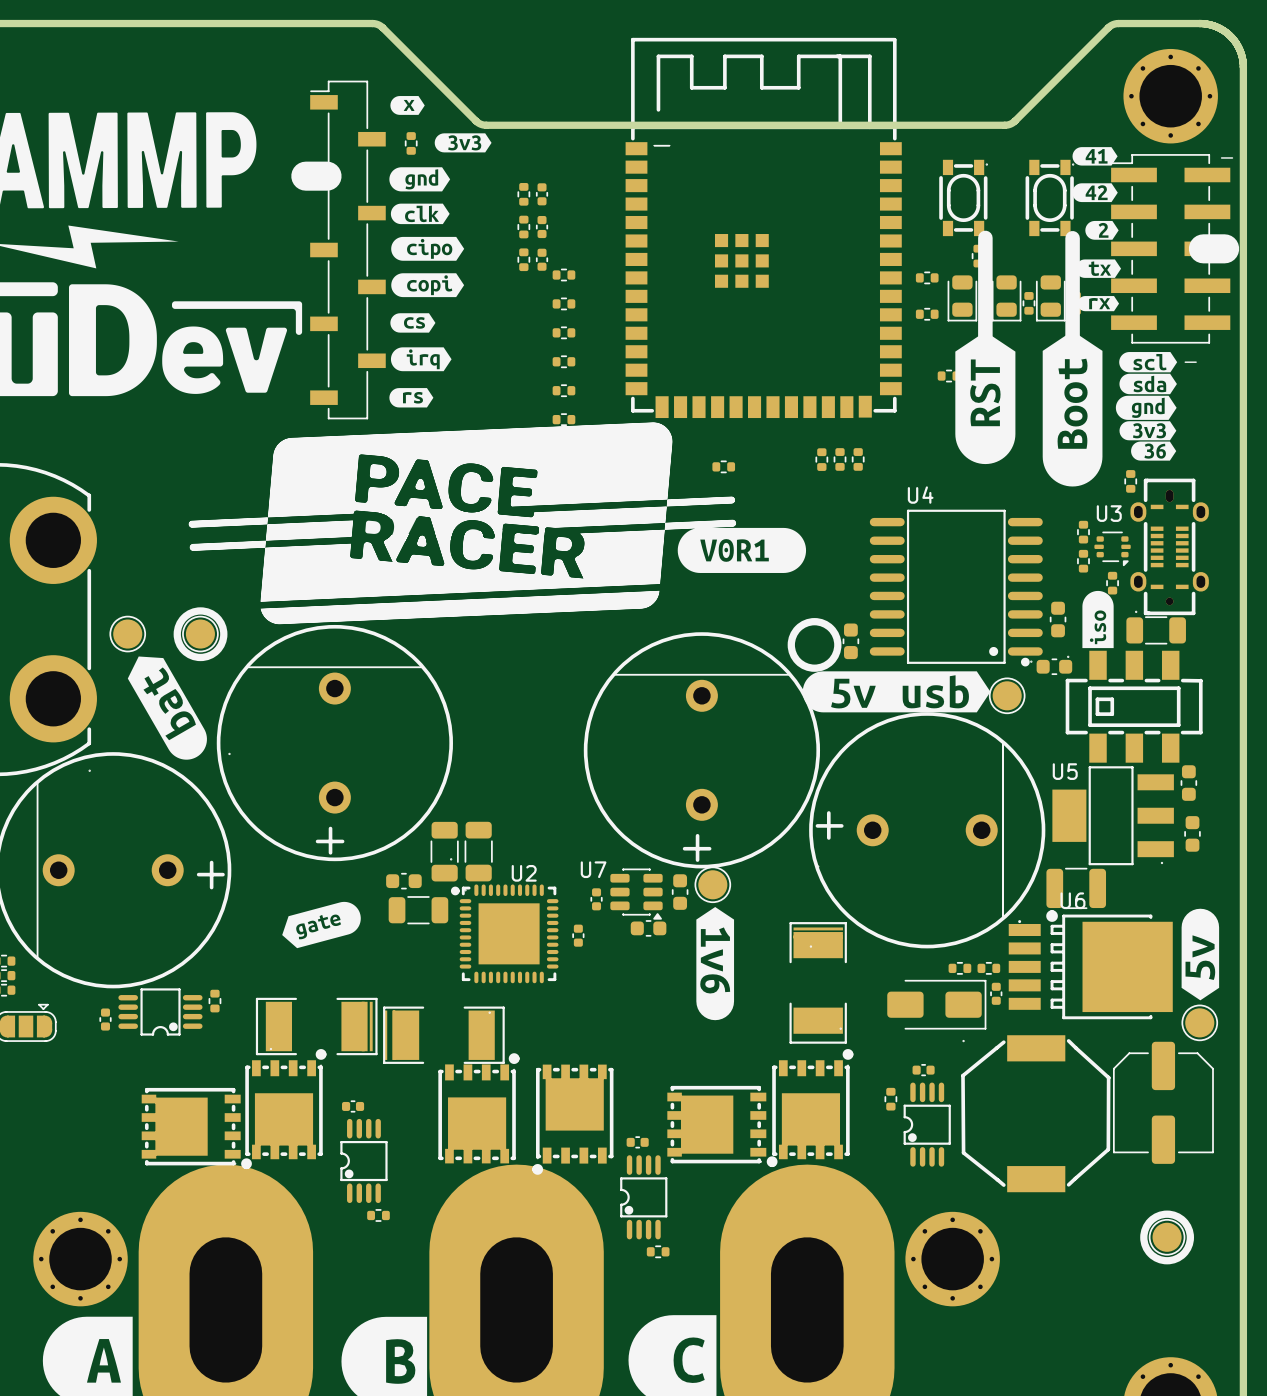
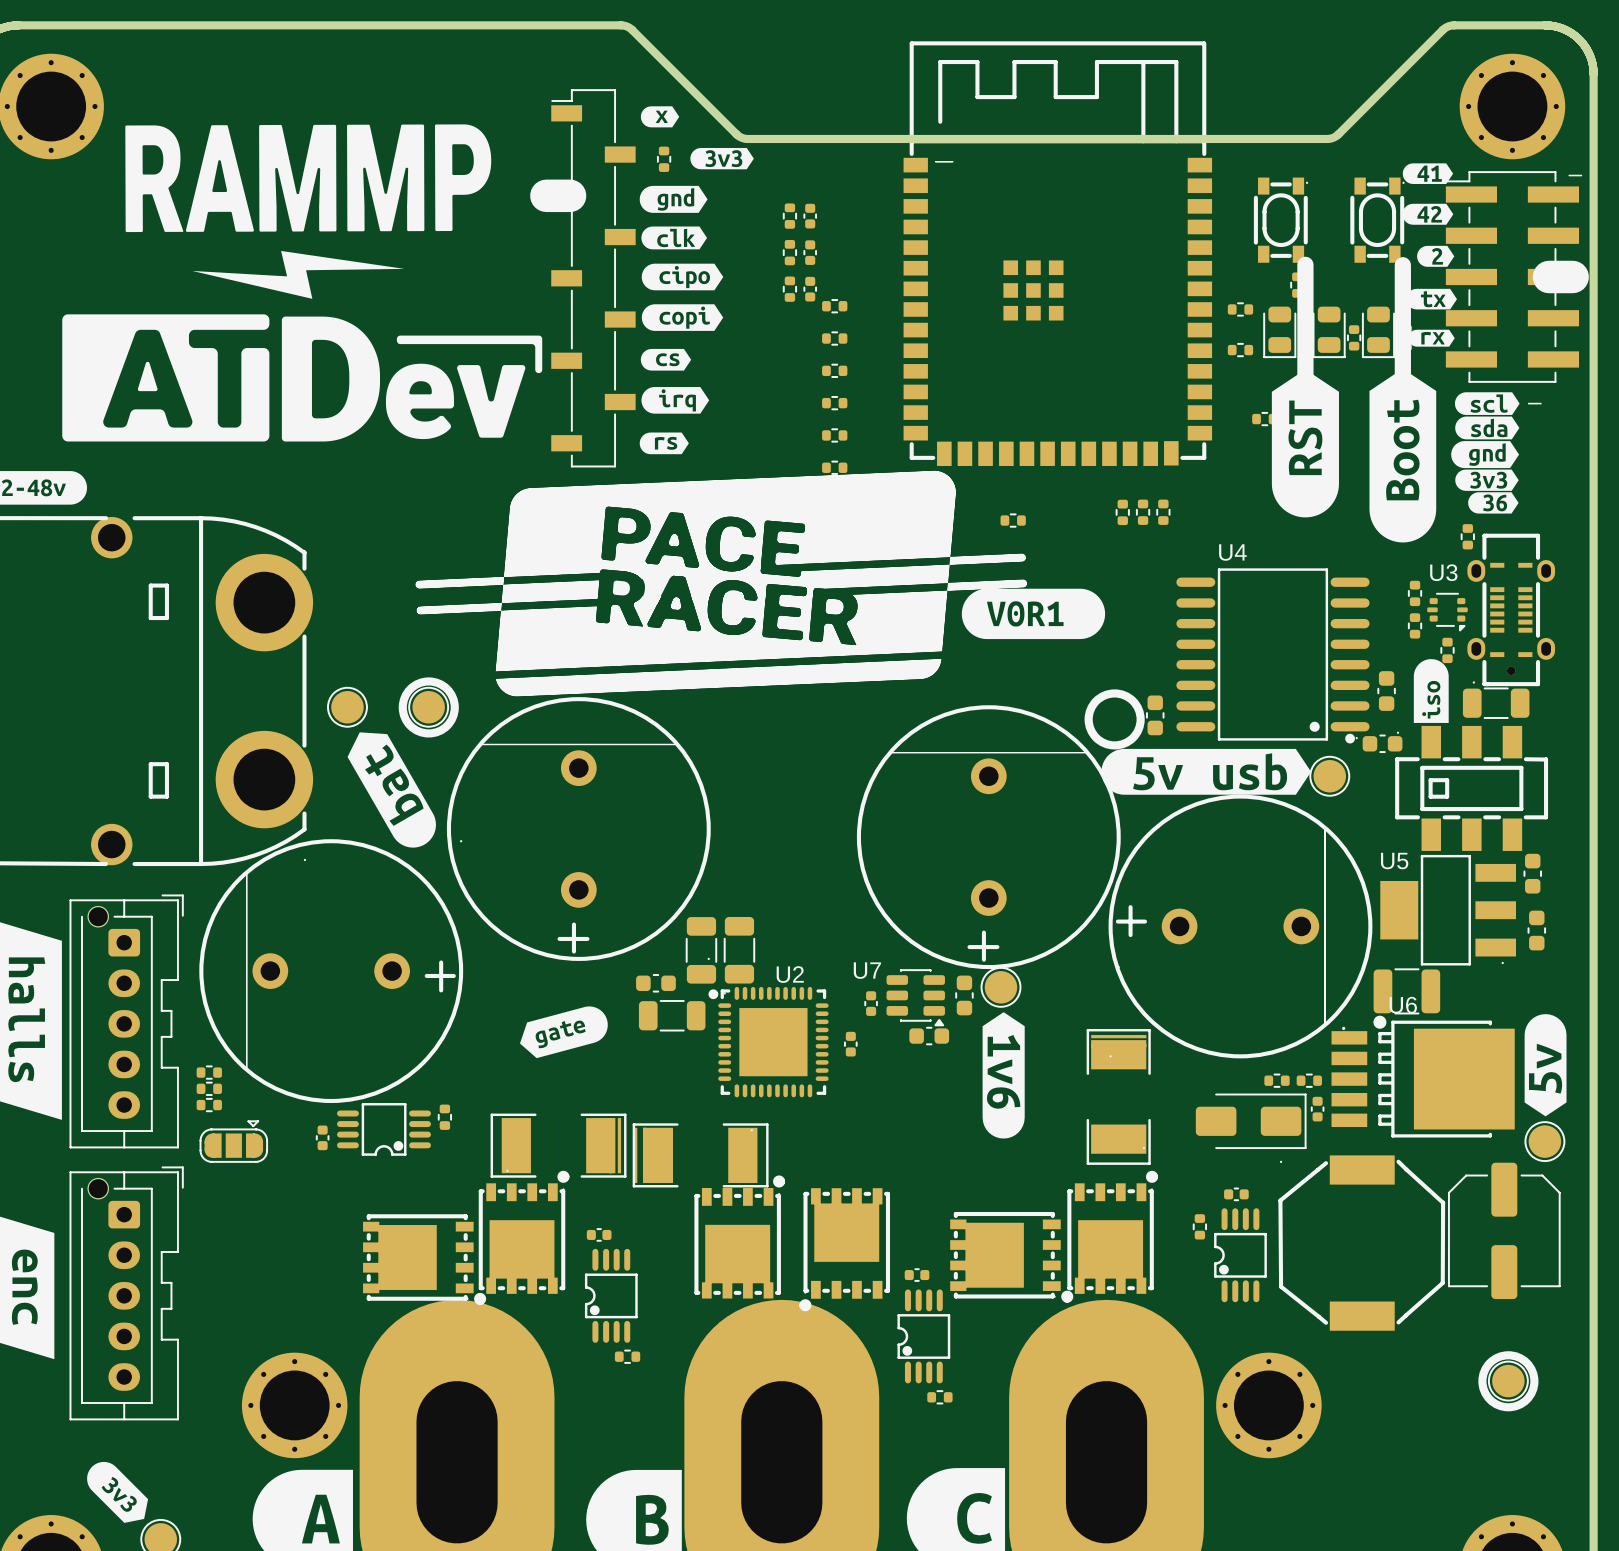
part footprint: [1130, 478, 1209, 616] -> [1467, 533, 1556, 687]

